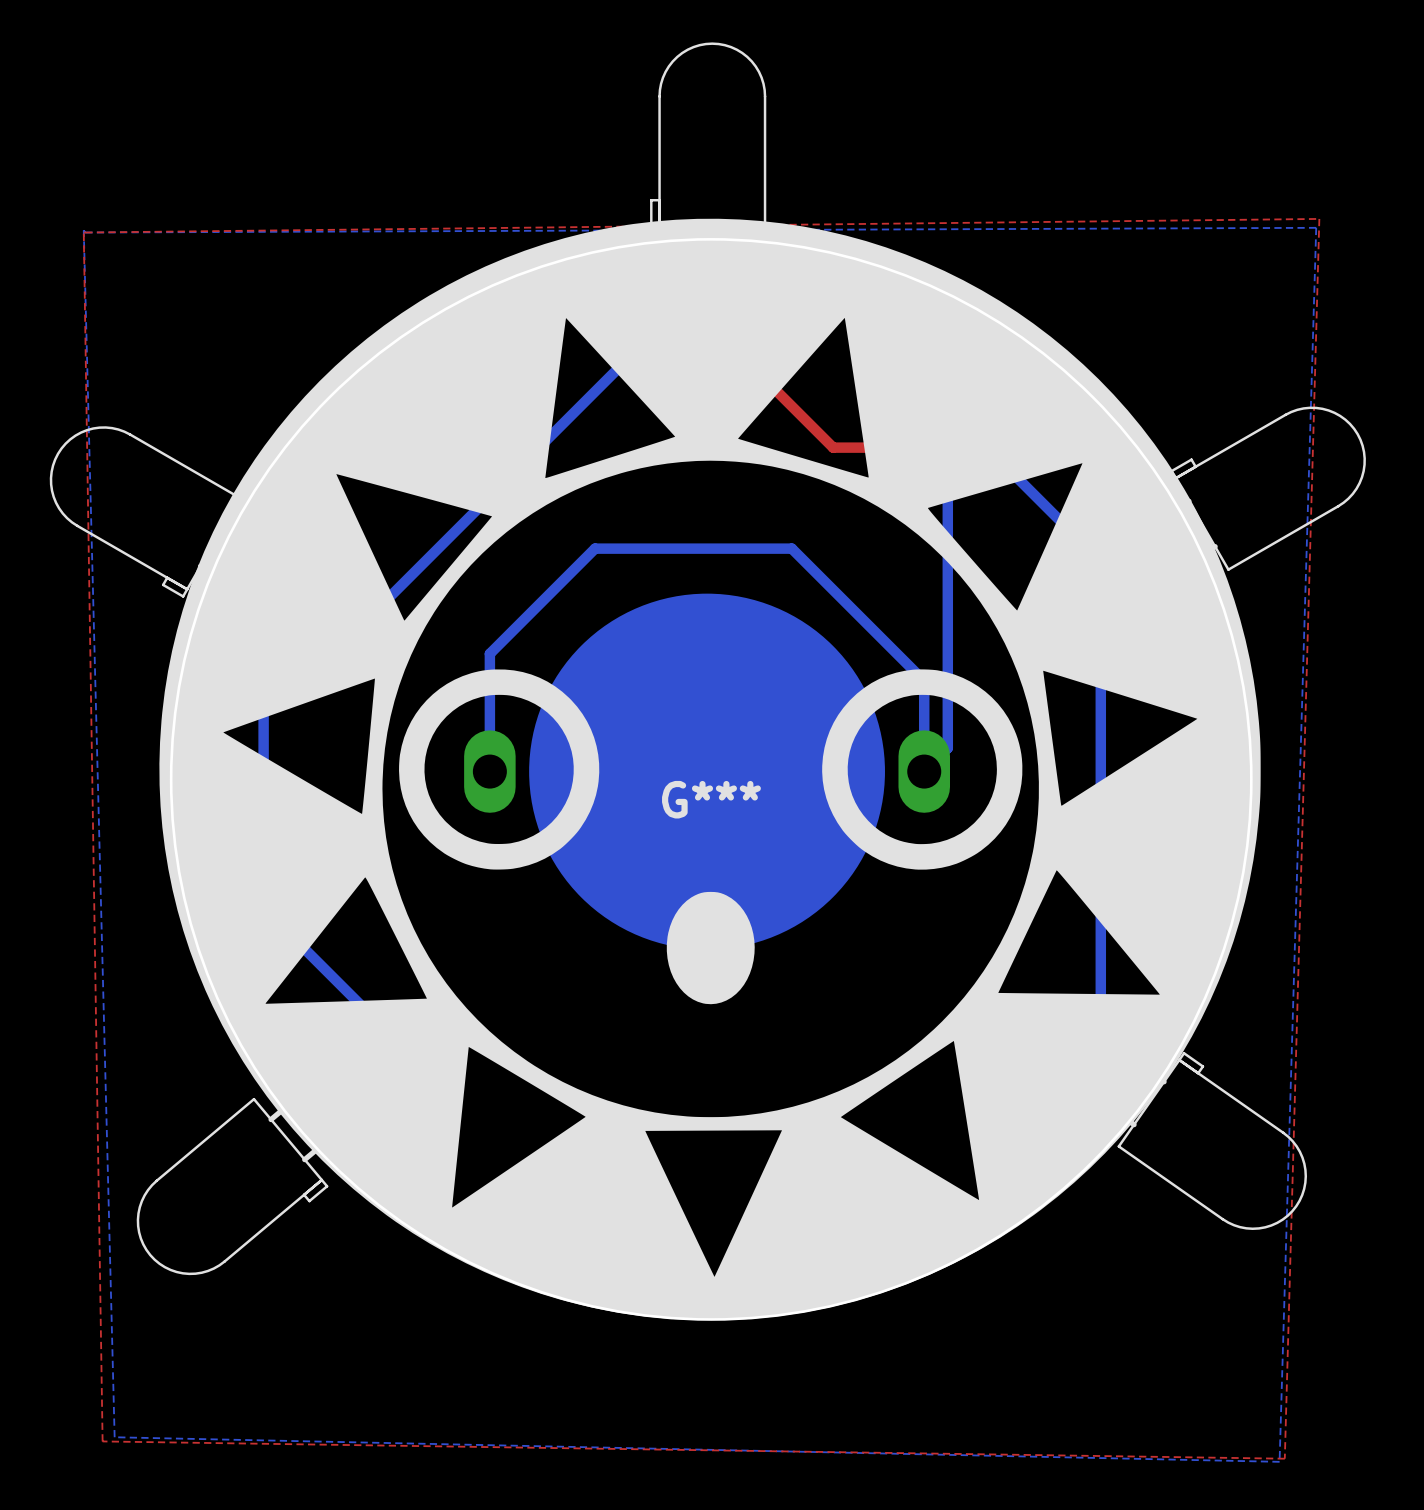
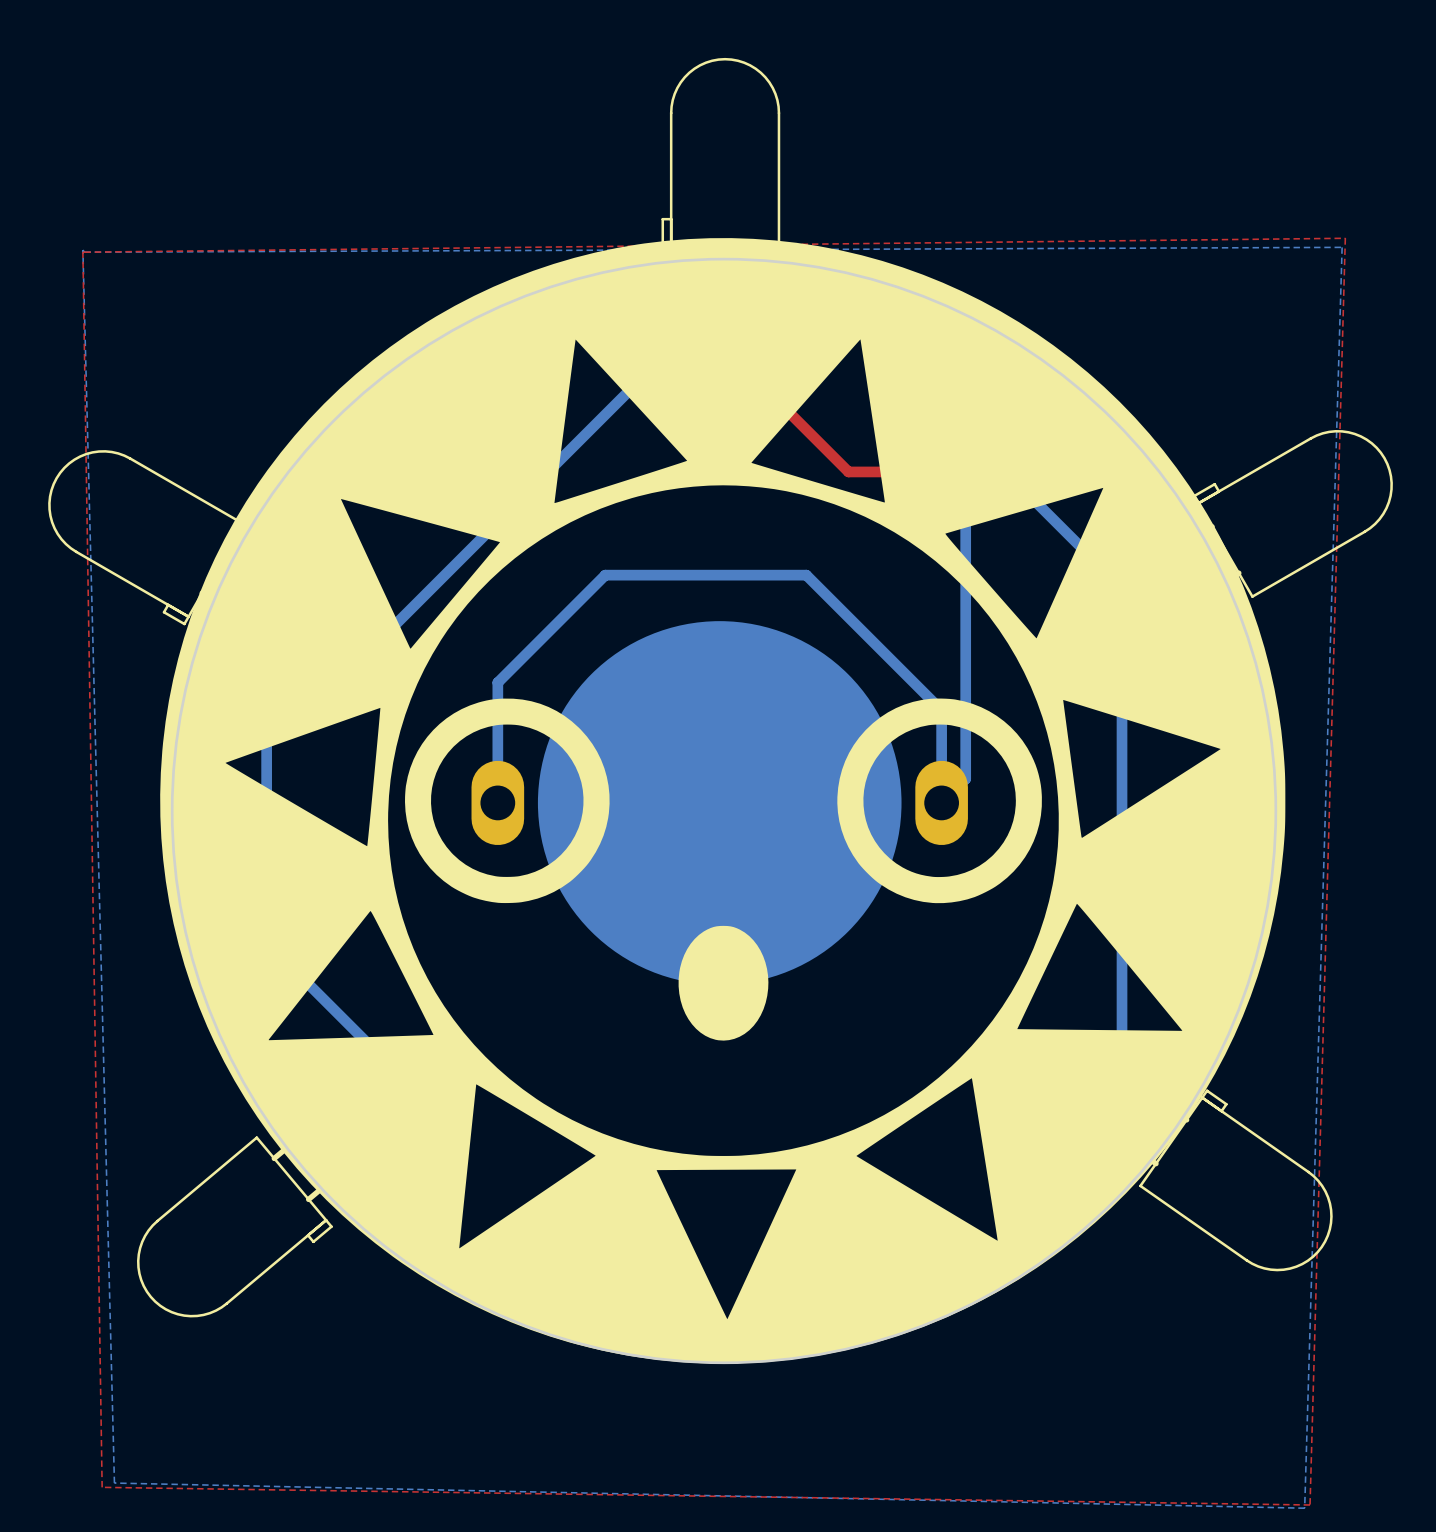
G***: (710, 769) -> none

